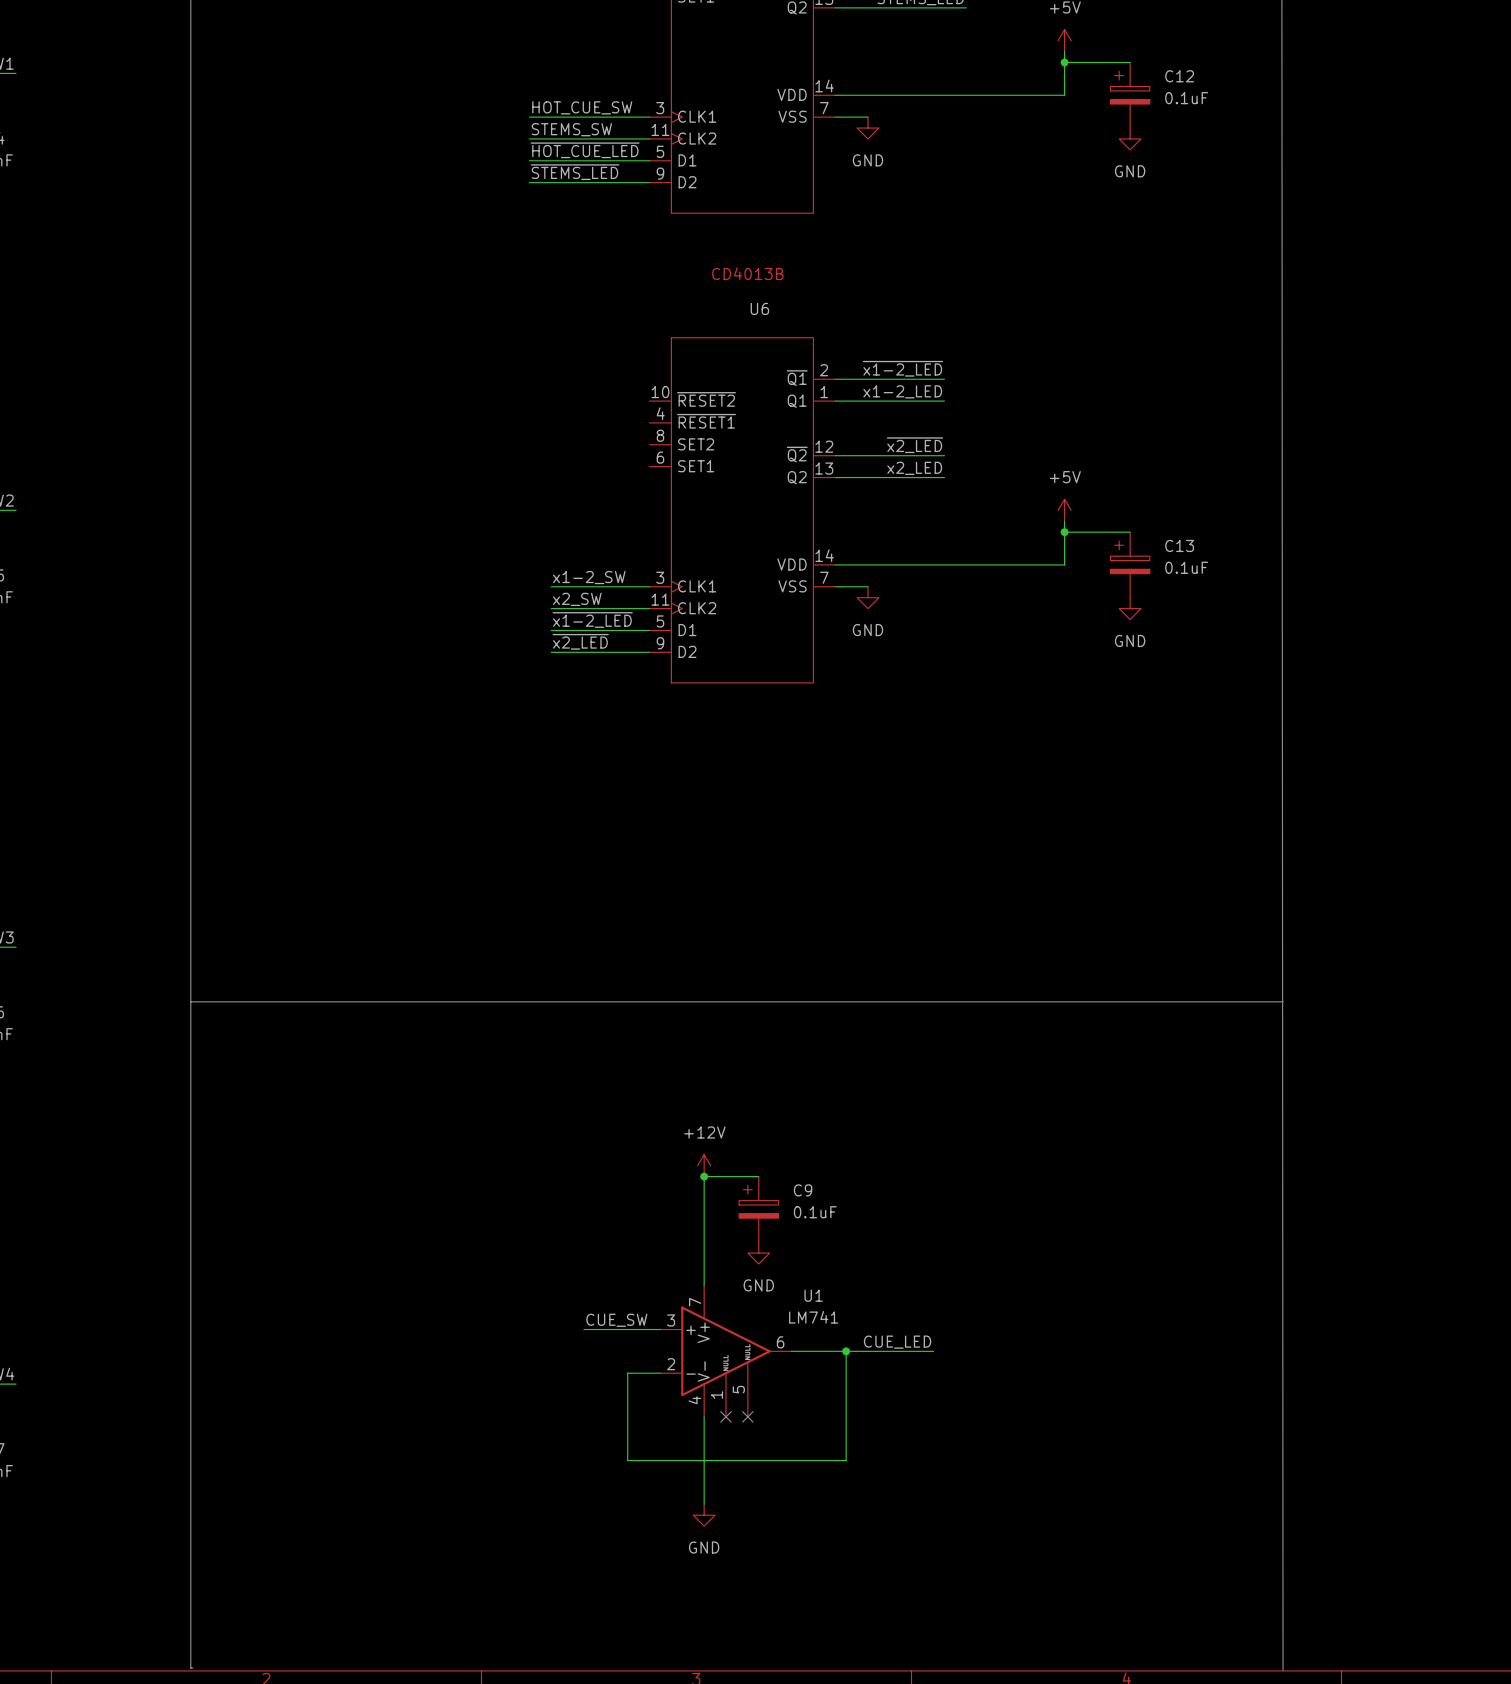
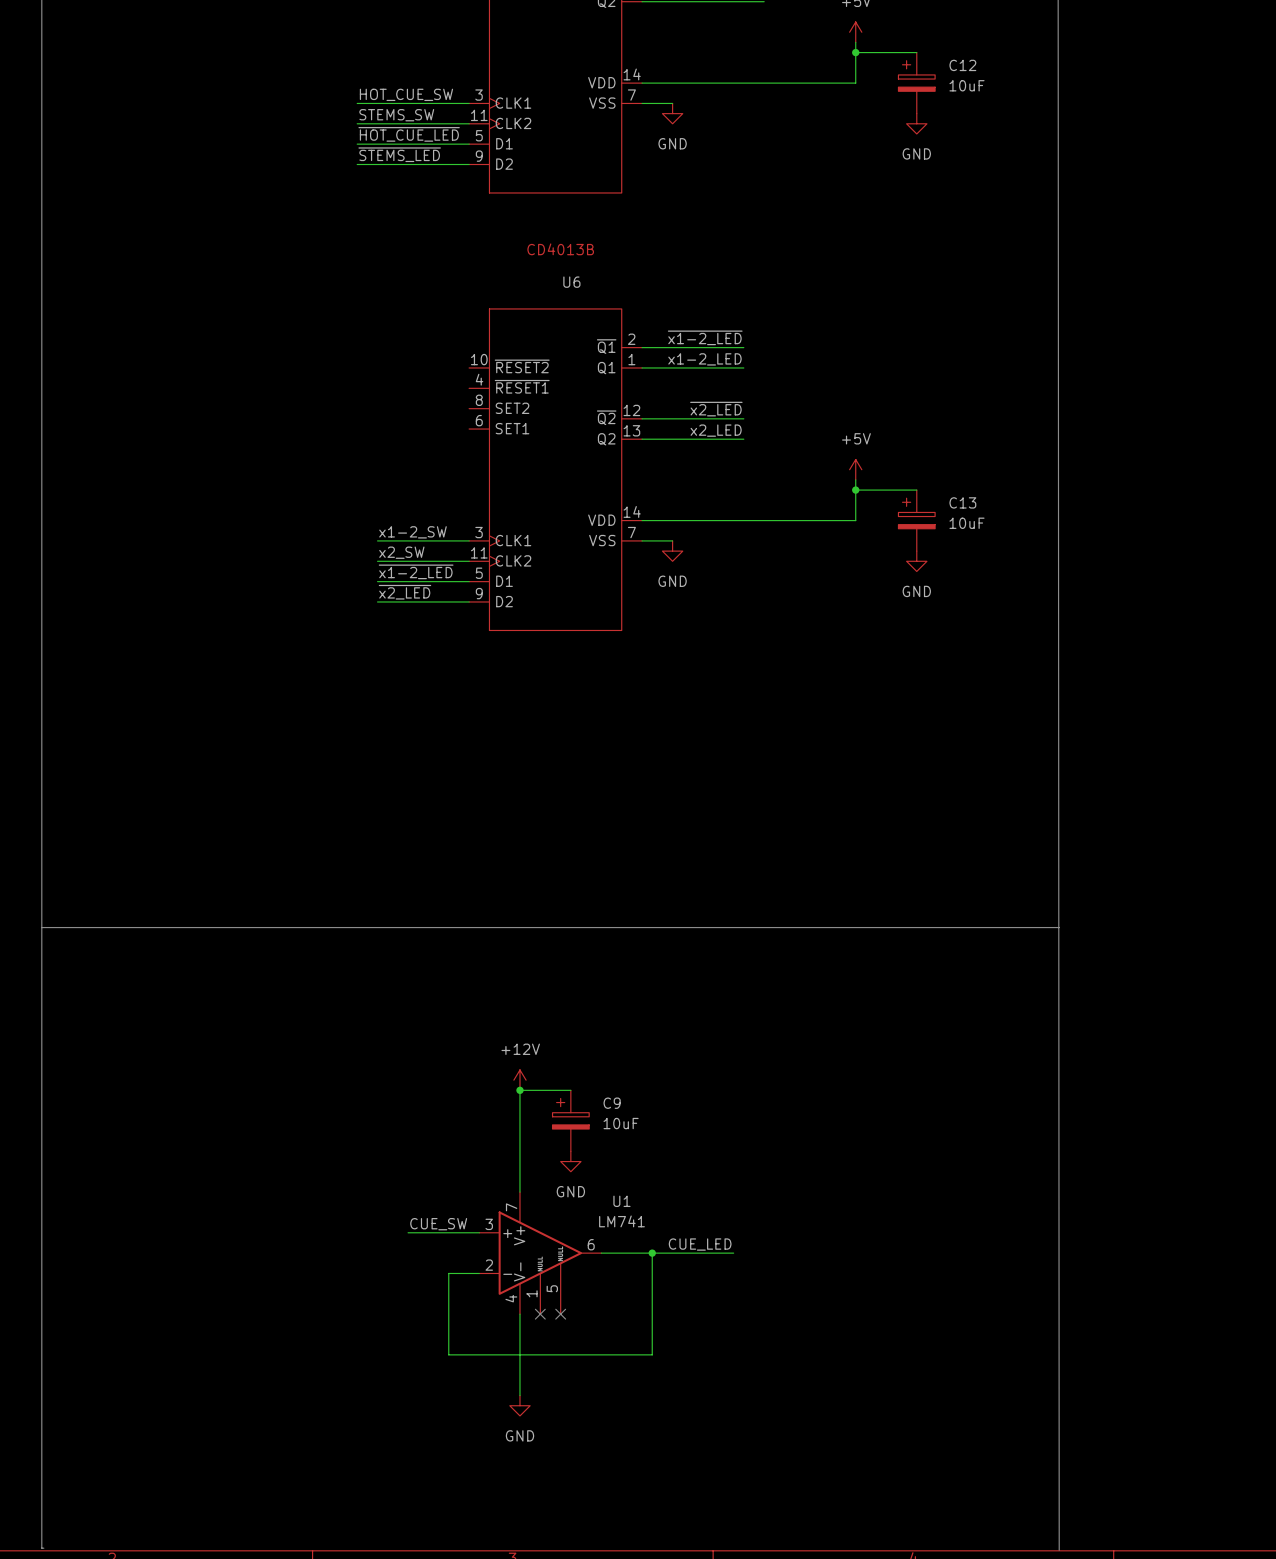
C12 value: 0.1uF (1186, 98) -> 10uF (967, 85)
C13 value: 0.1uF (1186, 567) -> 10uF (967, 523)
C9 value: 0.1uF (815, 1212) -> 10uF (621, 1123)

